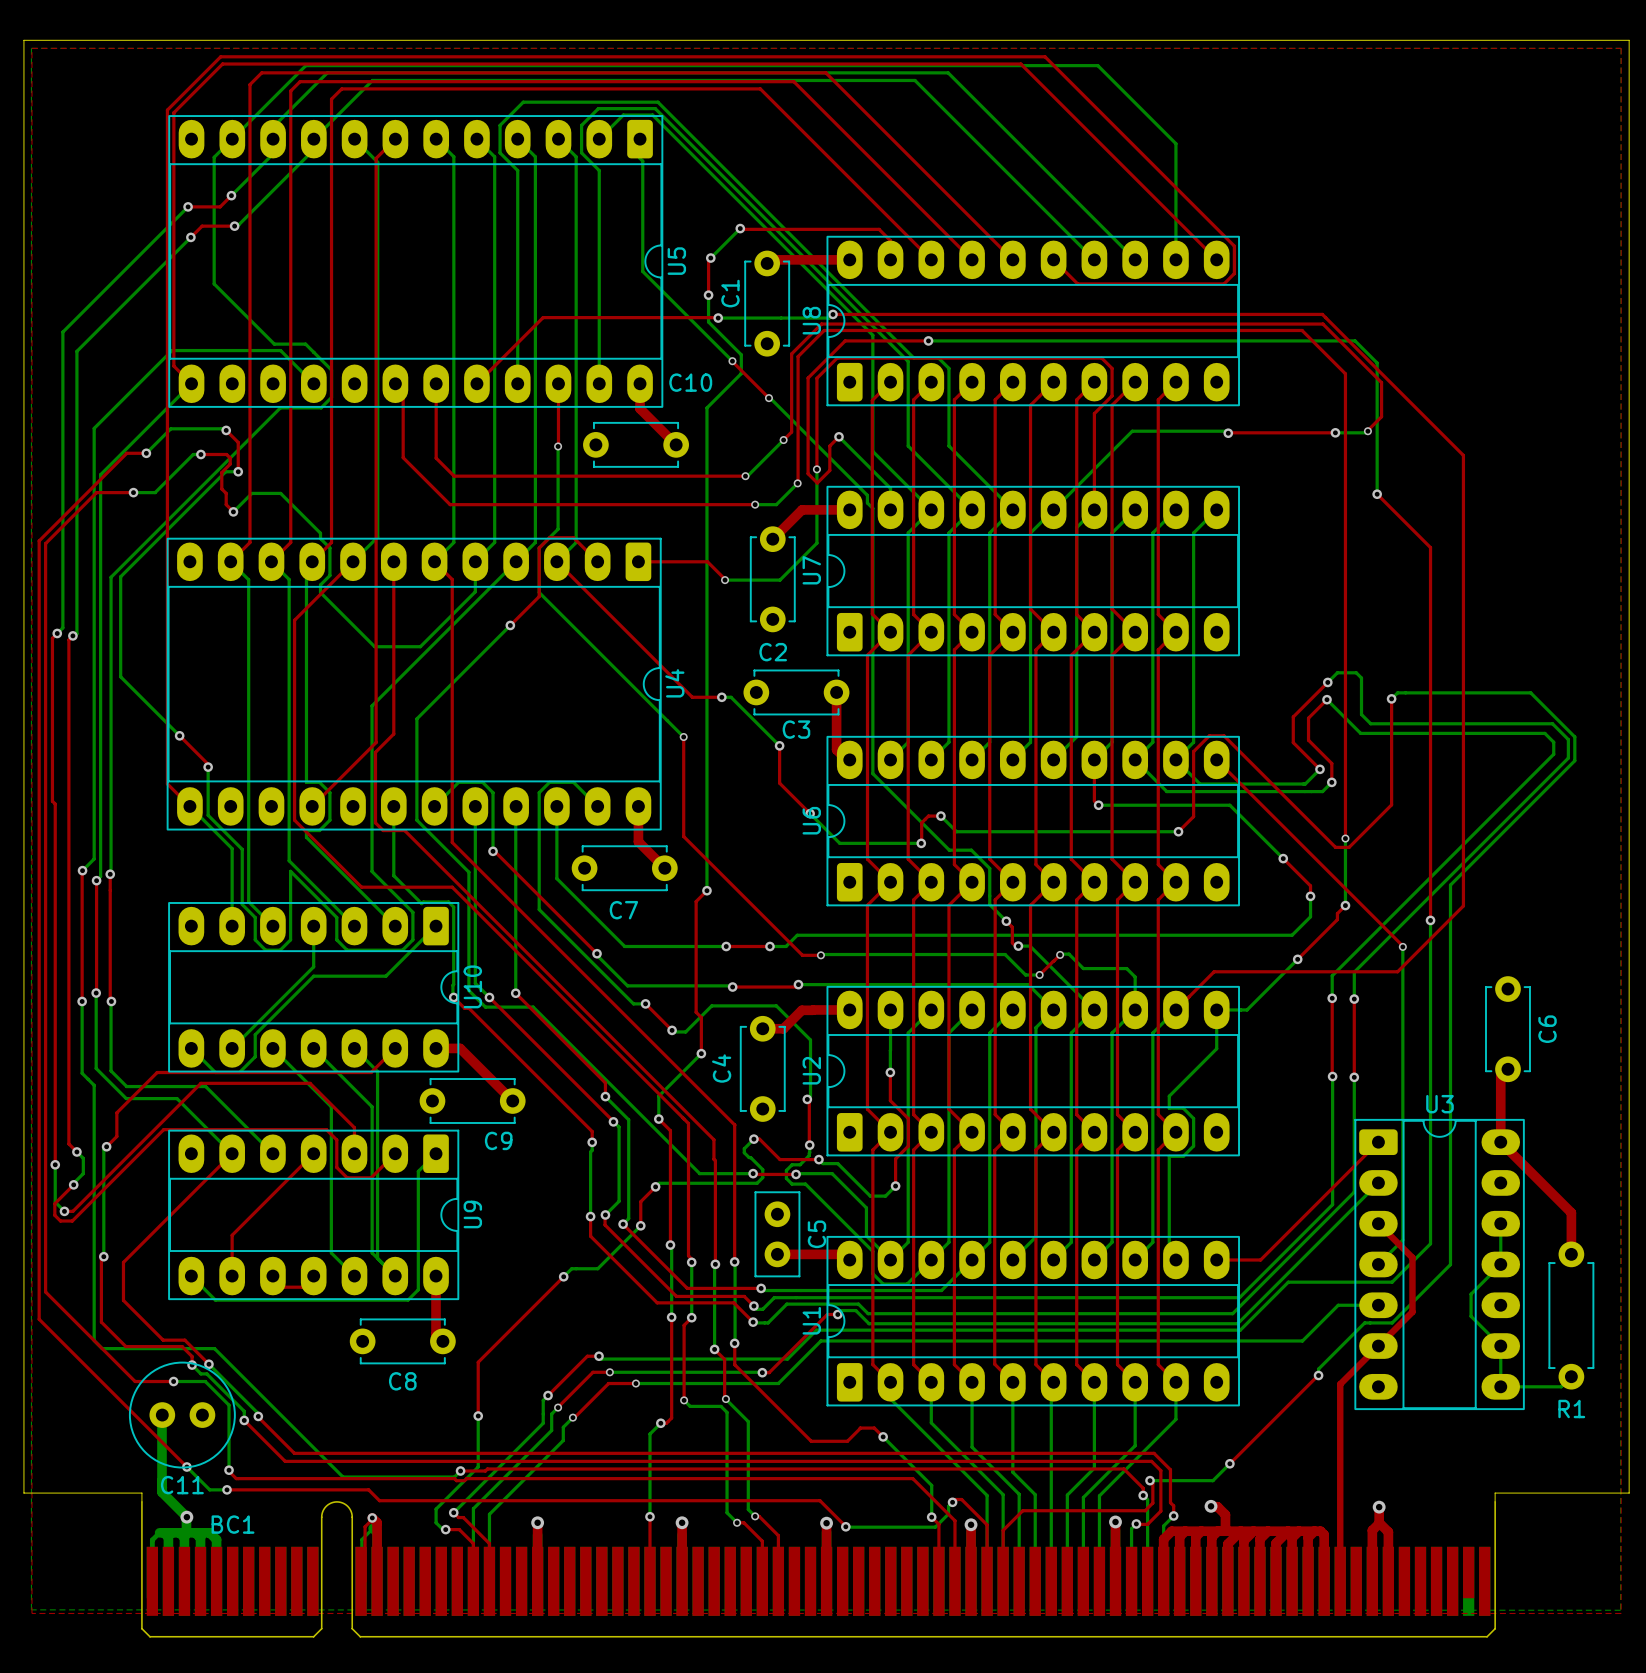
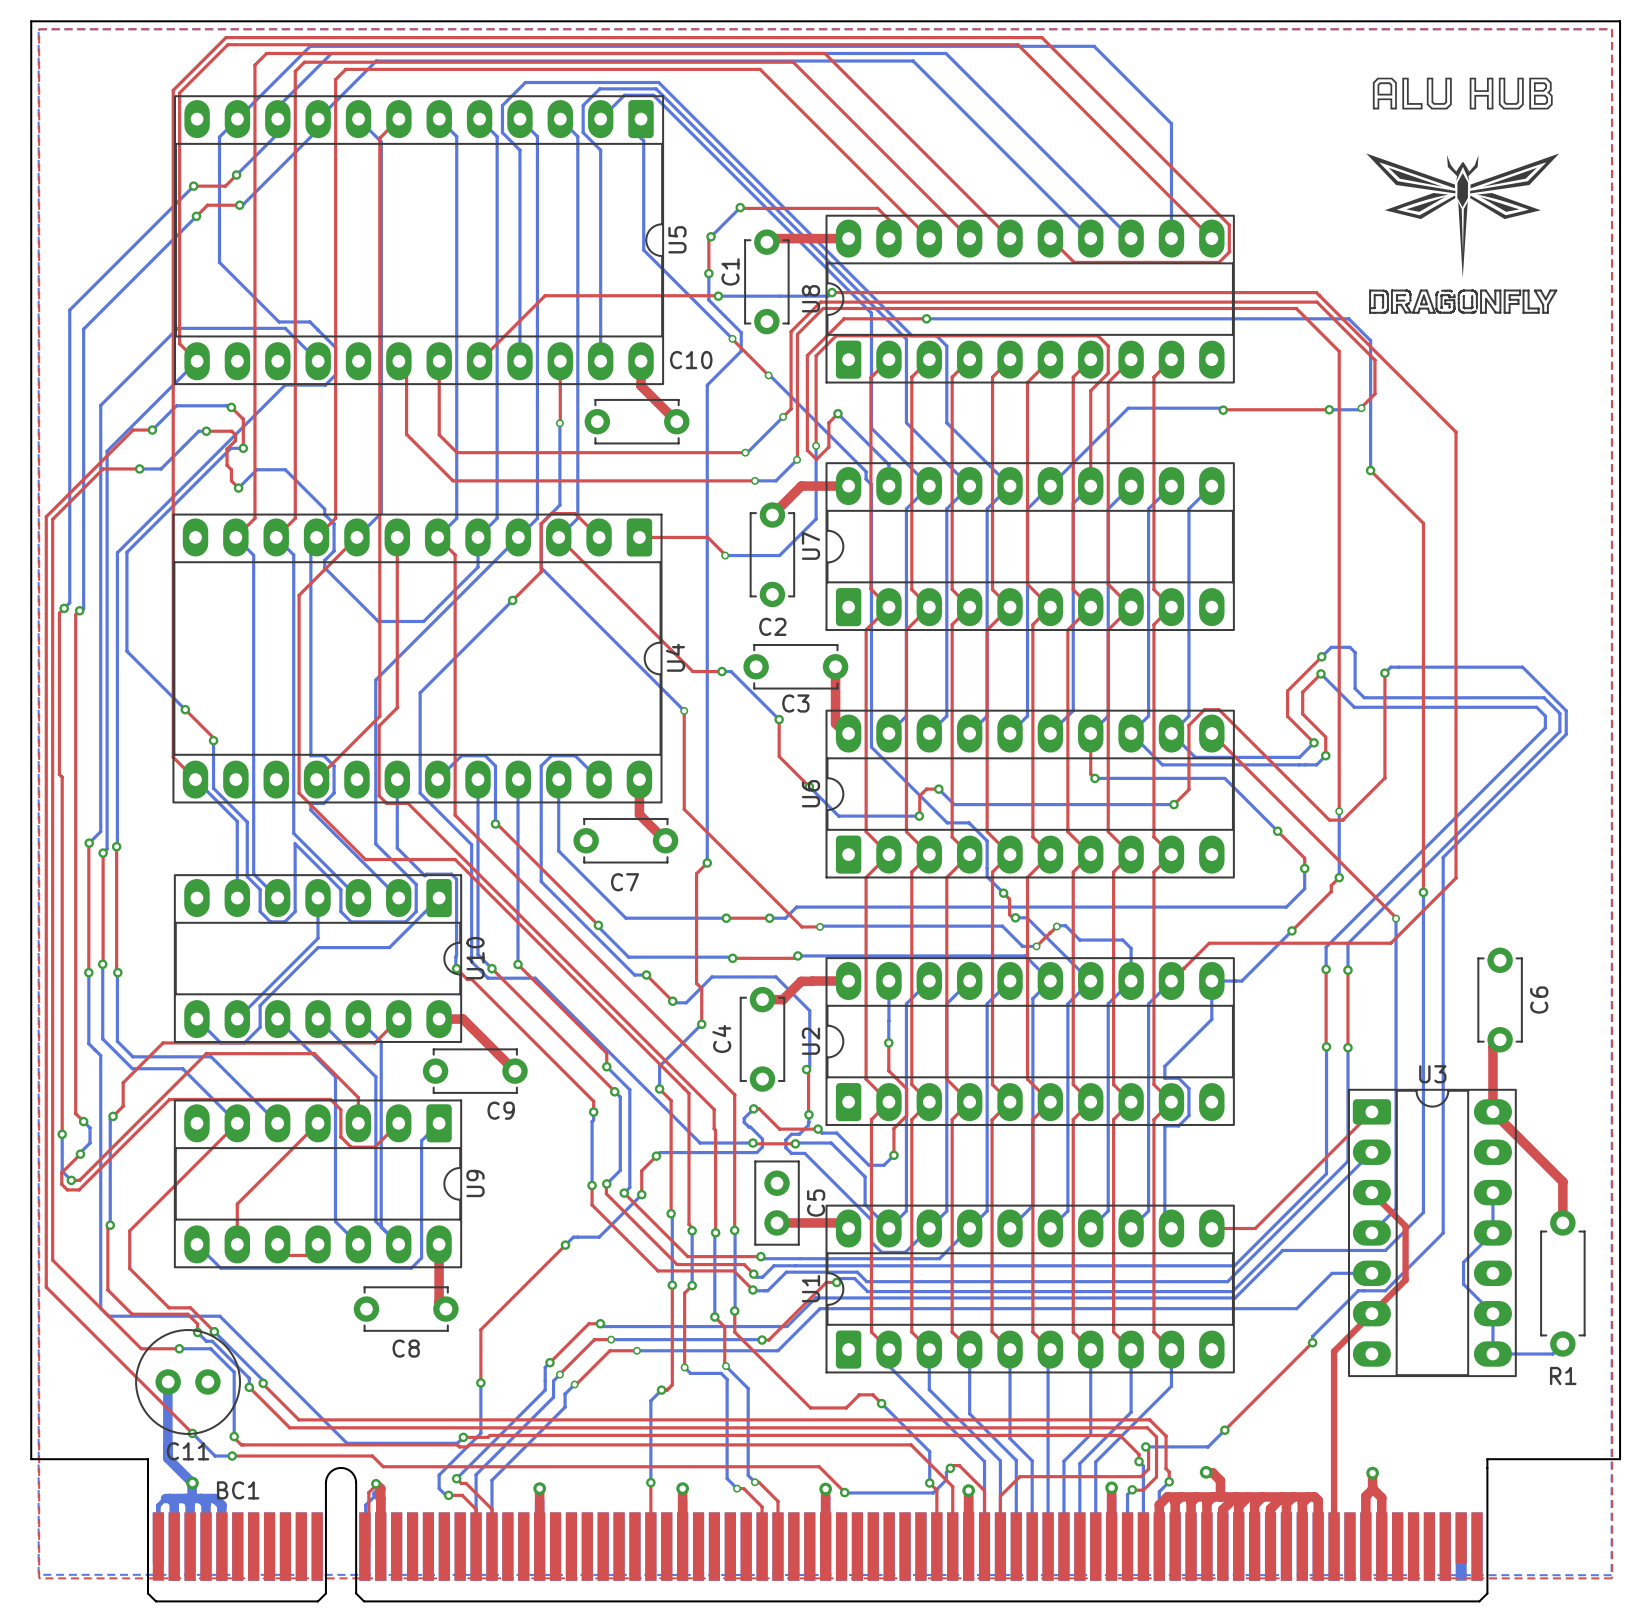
drawing: none -> [1372, 77, 1553, 110]
drawing: none -> [1366, 153, 1560, 279]
line: none -> (1406, 290) (1391, 290) (1391, 312) (1396, 312) (1396, 304) (1401, 304) (1405, 312) (1410, 312) (1407, 304)
line: none -> (1420, 290) (1426, 290) (1434, 312) (1429, 312) (1428, 308) (1419, 308) (1418, 312) (1413, 312) (1420, 290)
line: none -> (1441, 290) (1449, 290)
line: none -> (1472, 290) (1460, 291)
line: none -> (1481, 290) (1481, 312) (1485, 312) (1486, 298) (1495, 312) (1500, 312) (1500, 290) (1495, 290) (1495, 304) (1485, 290) (1481, 290)
line: none -> (1504, 290) (1504, 312) (1509, 312) (1509, 303) (1518, 303) (1518, 299) (1509, 299) (1509, 295) (1520, 295) (1520, 290) (1504, 290)
line: none -> (1523, 290) (1523, 312) (1538, 312) (1538, 308) (1528, 308) (1528, 290) (1523, 290)
line: none -> (1534, 290) (1540, 290) (1545, 299) (1550, 290) (1556, 290) (1547, 304) (1547, 312) (1543, 312) (1543, 304) (1534, 290)
line: none -> (1385, 291) (1370, 290) (1370, 312) (1386, 312)
line: none -> (1387, 293) (1388, 307)
line: none -> (1410, 293) (1410, 300)
line: none -> (1436, 293) (1436, 308)
line: none -> (1476, 293) (1476, 308)
line: none -> (1454, 294) (1454, 297) (1449, 296)
line: none -> (1381, 295) (1374, 295) (1374, 308) (1370, 308)
line: none -> (1383, 295) (1383, 306)
line: none -> (1404, 295) (1396, 295) (1396, 300) (1404, 300)
line: none -> (1423, 295) (1420, 304) (1426, 304) (1423, 295)
line: none -> (1441, 295) (1441, 307)
line: none -> (1442, 295) (1448, 295)
line: none -> (1458, 295) (1459, 309)
line: none -> (1472, 295) (1472, 306)
line: none -> (1463, 296) (1463, 307)
line: none -> (1449, 307) (1449, 304) (1445, 303) (1445, 300) (1454, 300) (1454, 308)
line: none -> (1387, 308) (1387, 309)
line: none -> (1465, 308) (1471, 308)
line: none -> (1436, 309) (1436, 310)
line: none -> (1452, 311) (1451, 312)
line: none -> (1439, 312) (1450, 312)
line: none -> (1461, 312) (1462, 312)
line: none -> (1473, 312) (1463, 312)

